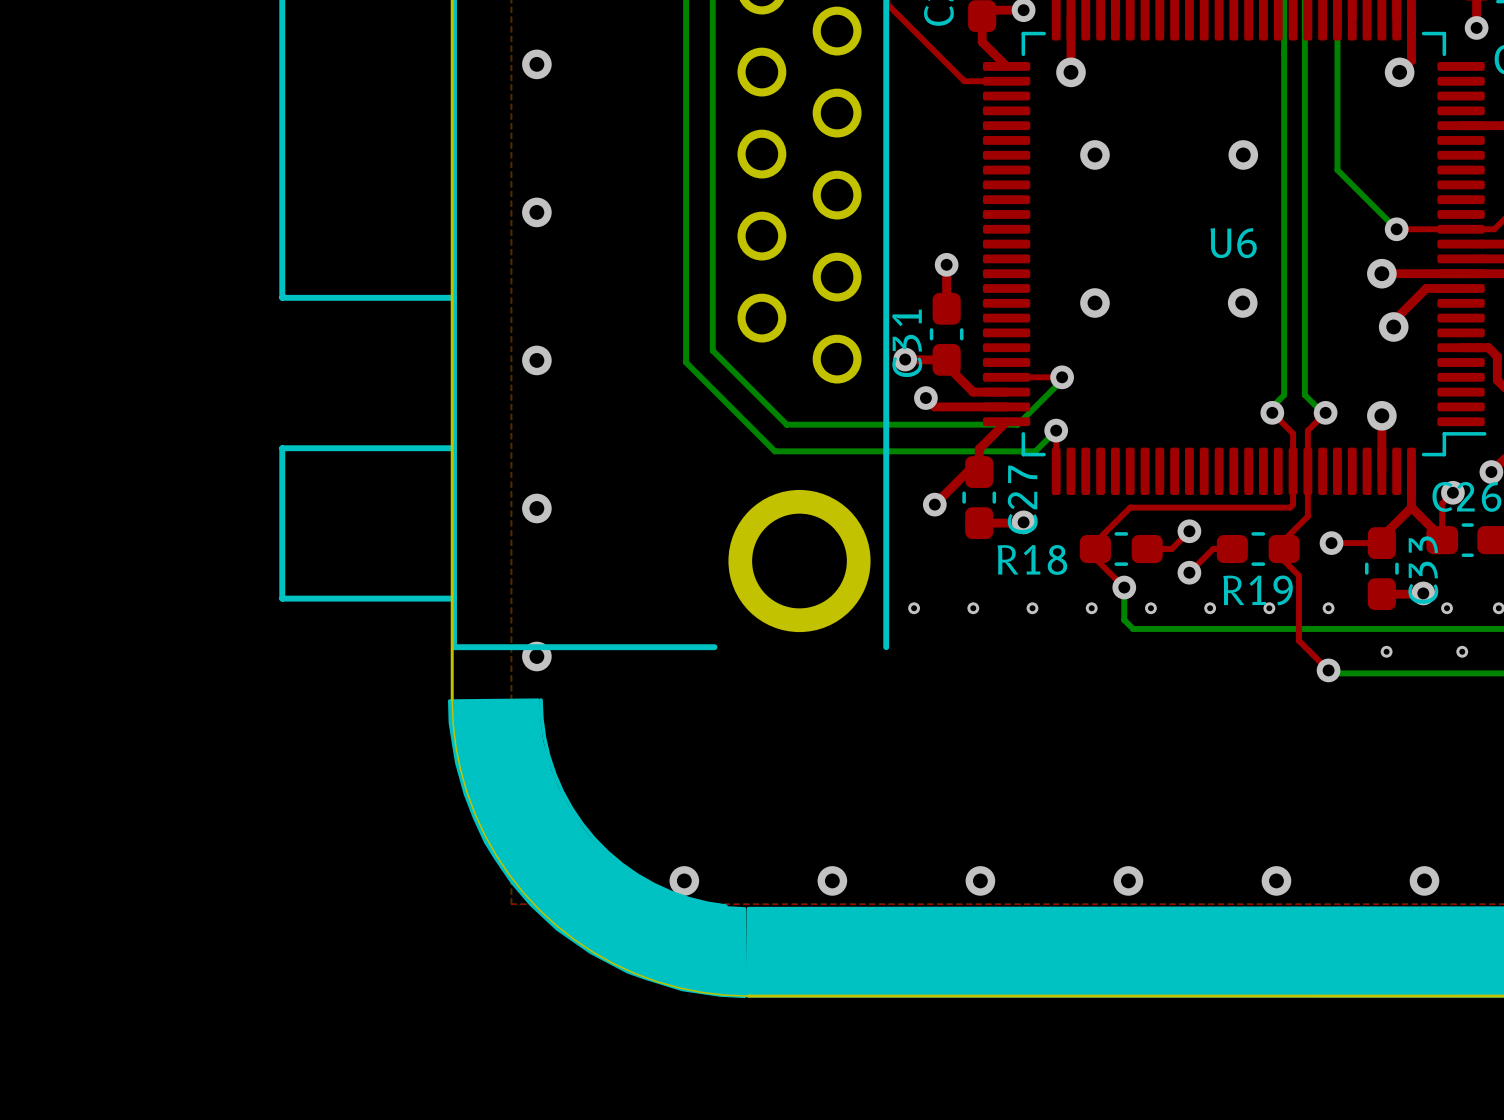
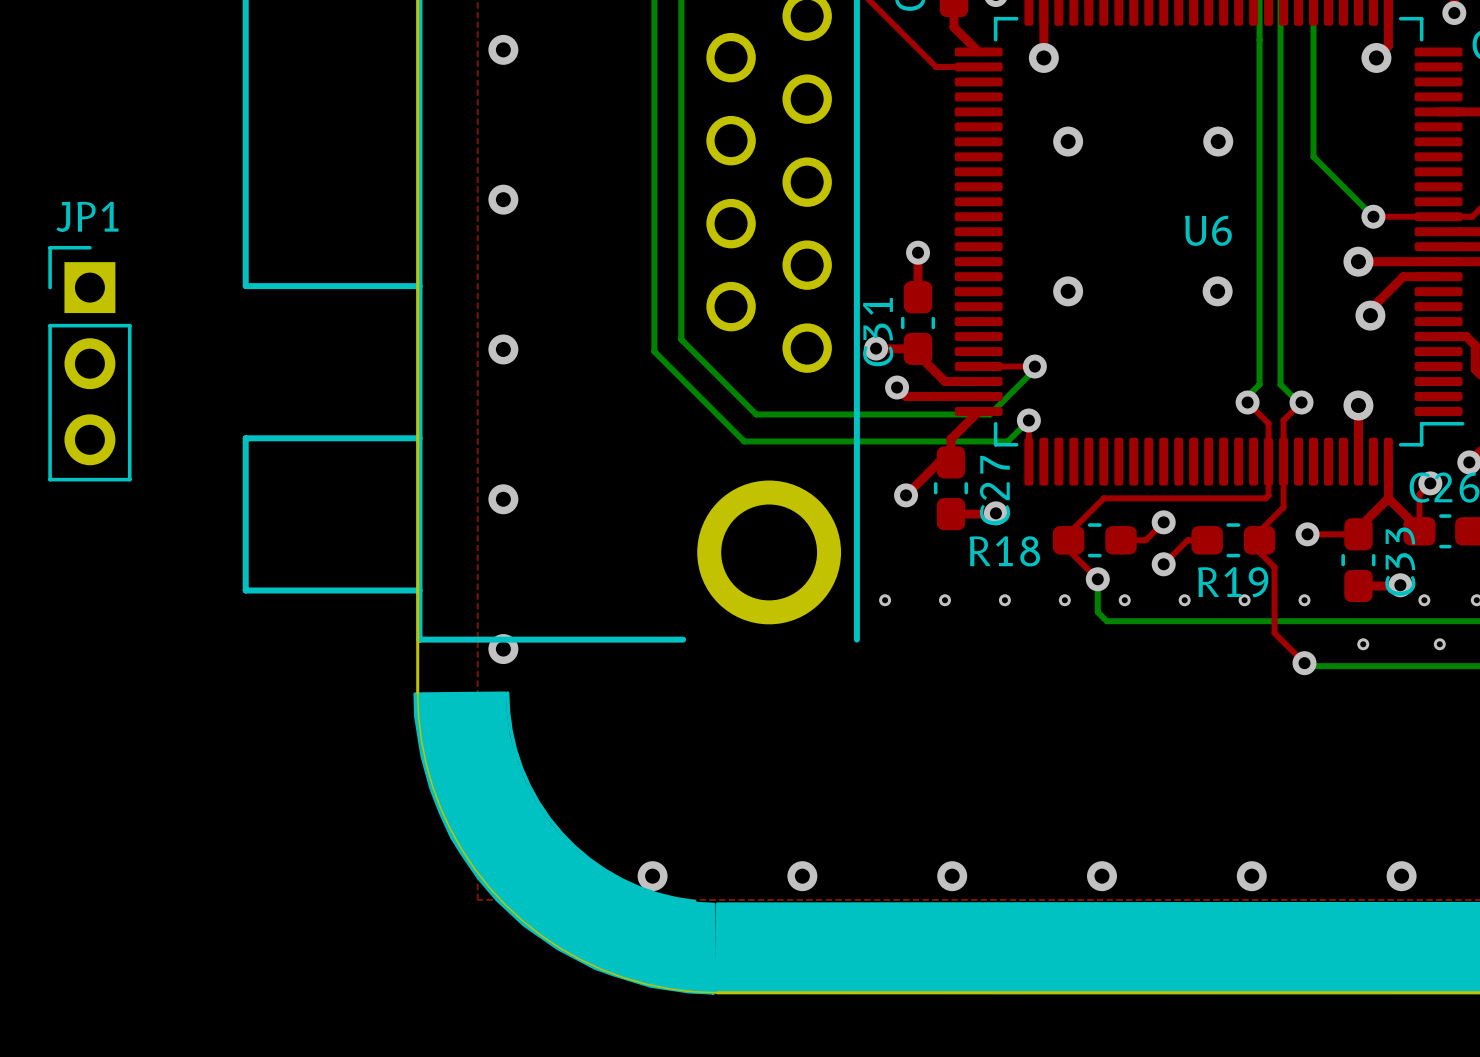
JP1: none -> (89, 363)

